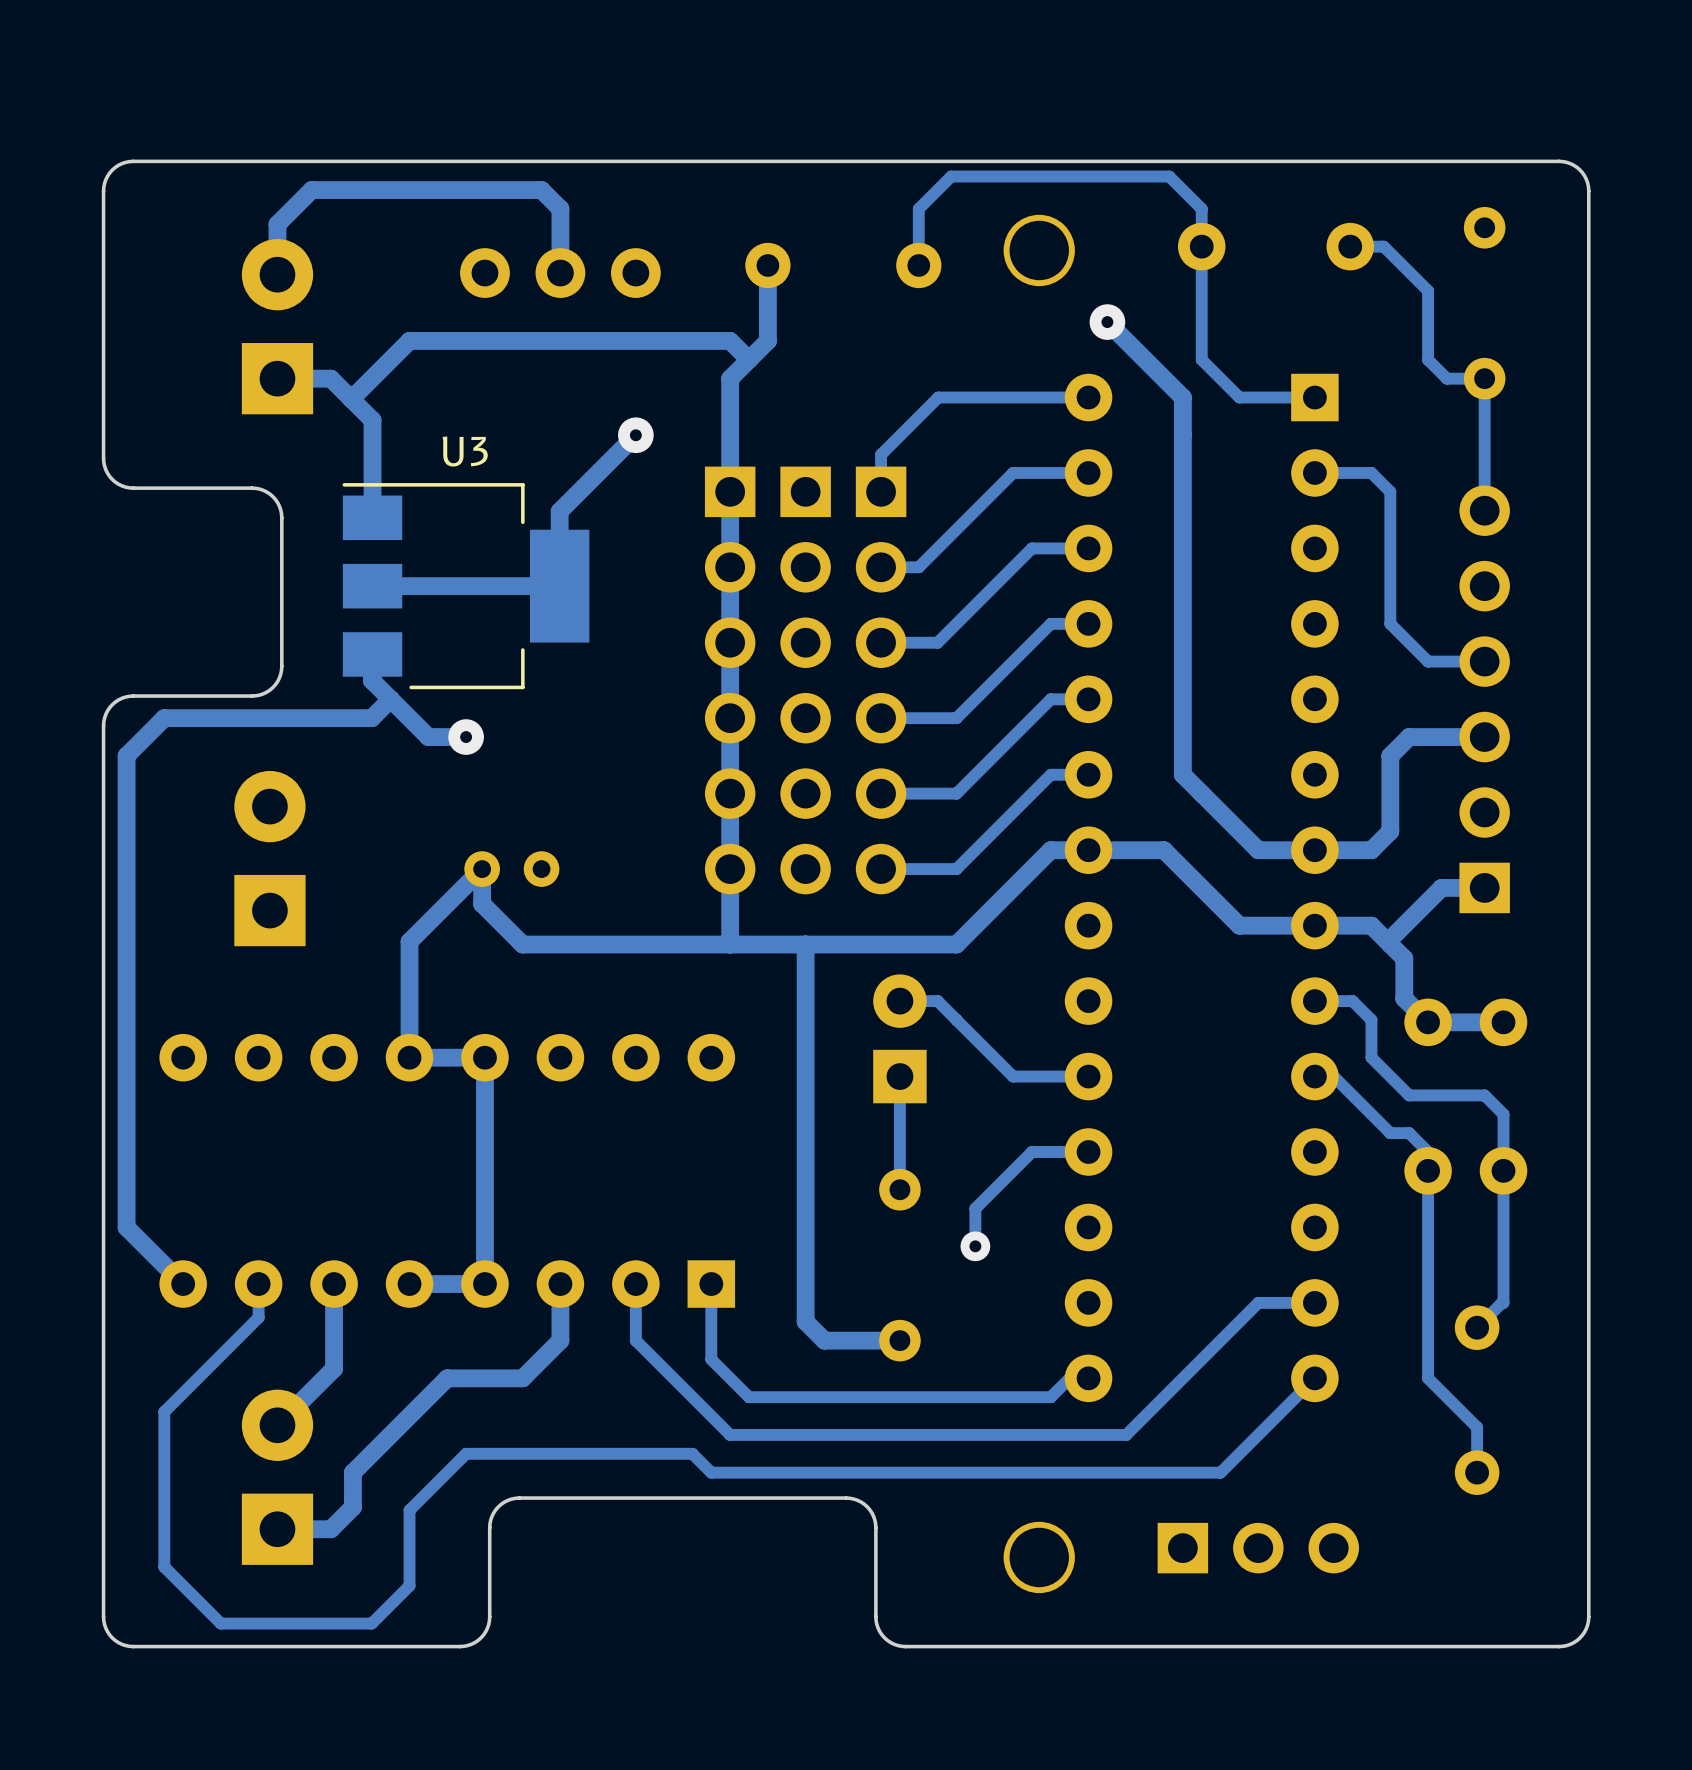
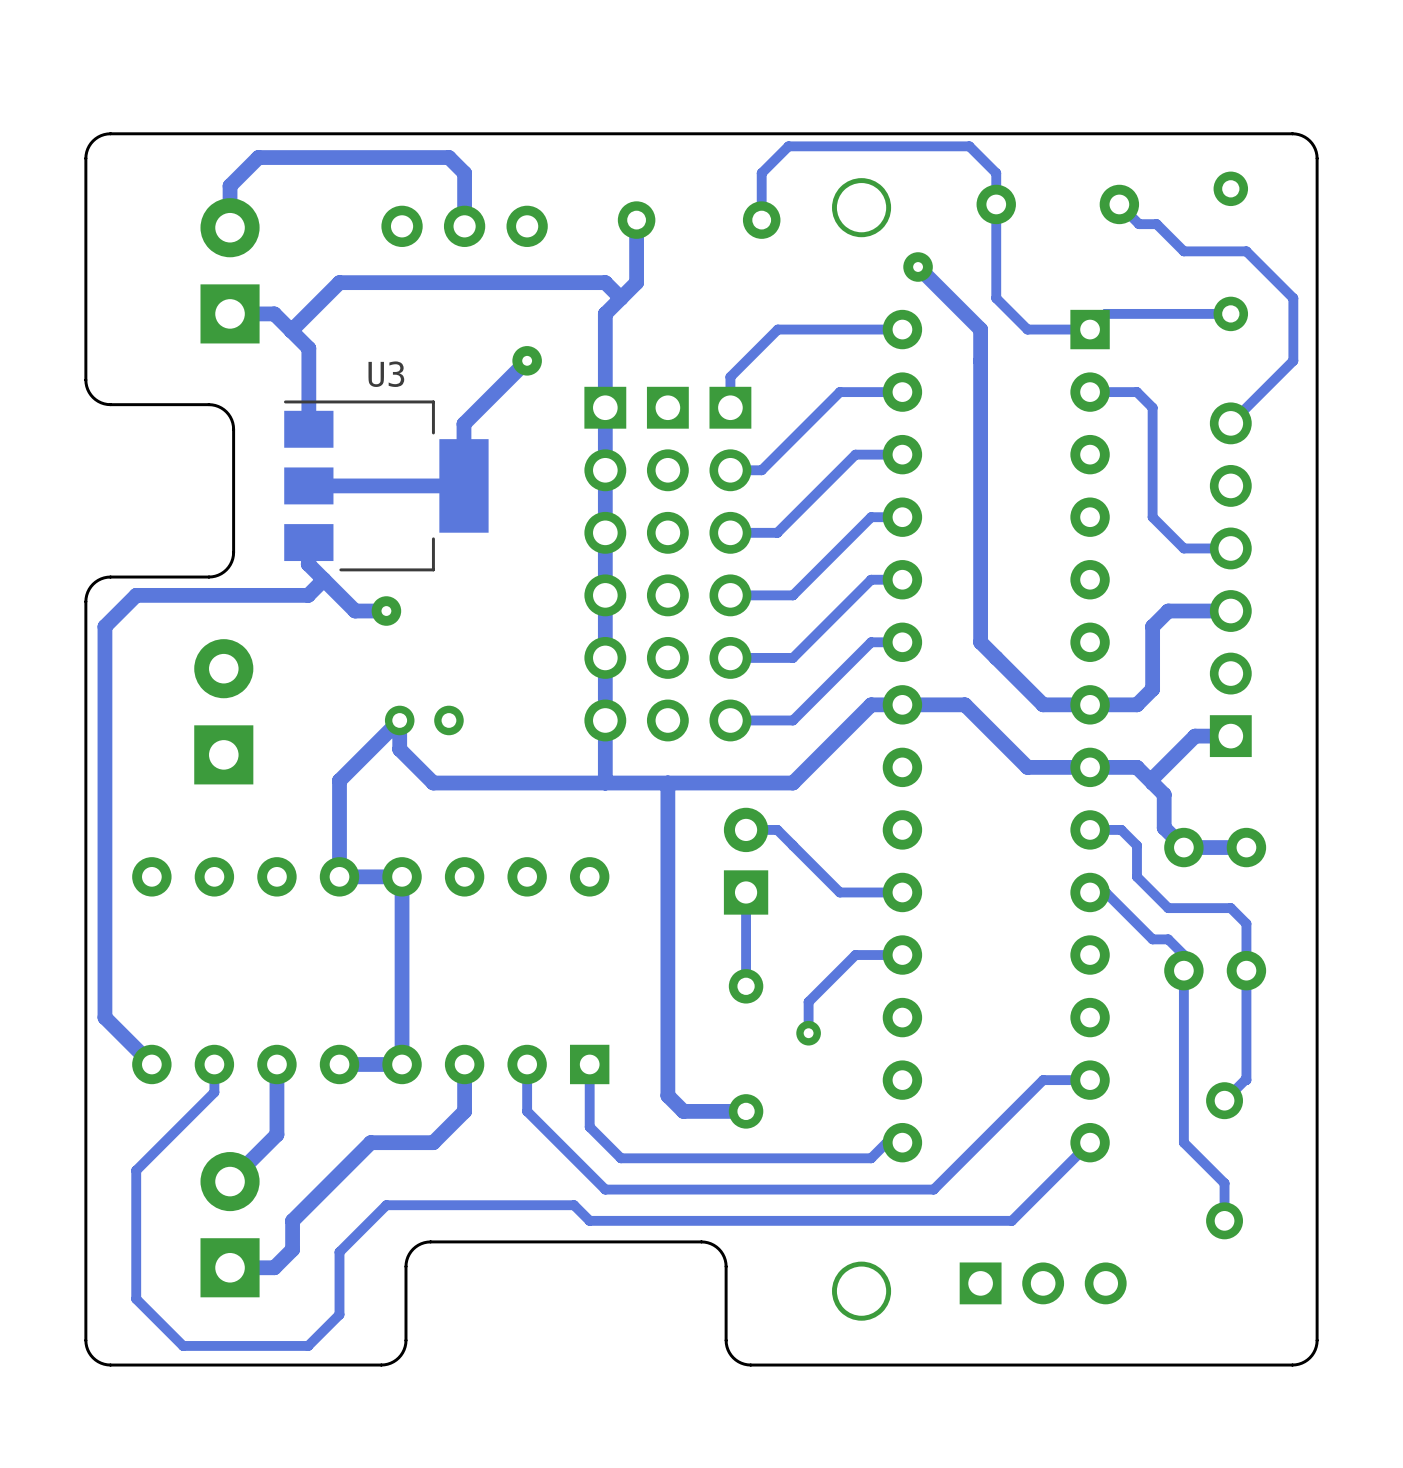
track: (1350, 246) (1383, 246) (1428, 290) (1428, 359) (1446, 378) -> (1119, 204) (1139, 224) (1156, 224) (1183, 251) (1246, 251) (1293, 298) (1293, 360) (1230, 423)
track: none -> (1199, 313) (1105, 313) (1090, 329)
track: (1484, 378) (1484, 510) -> none

